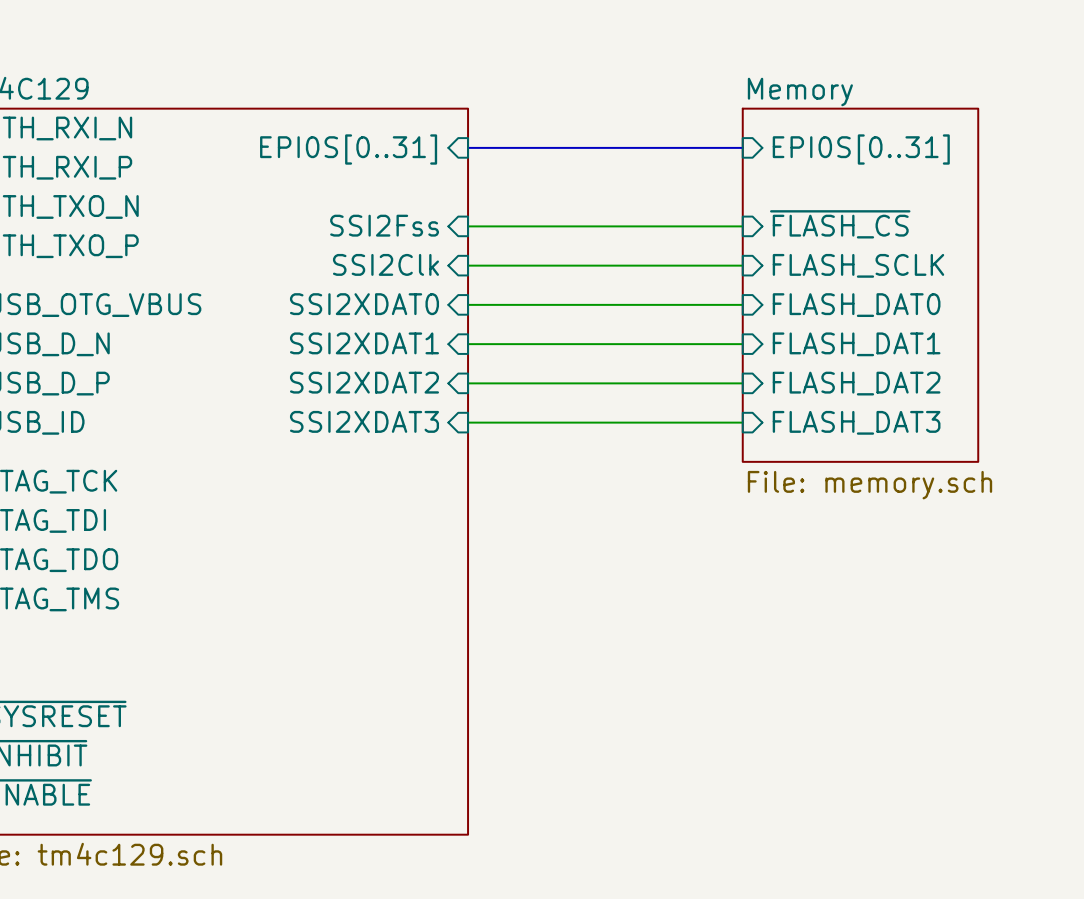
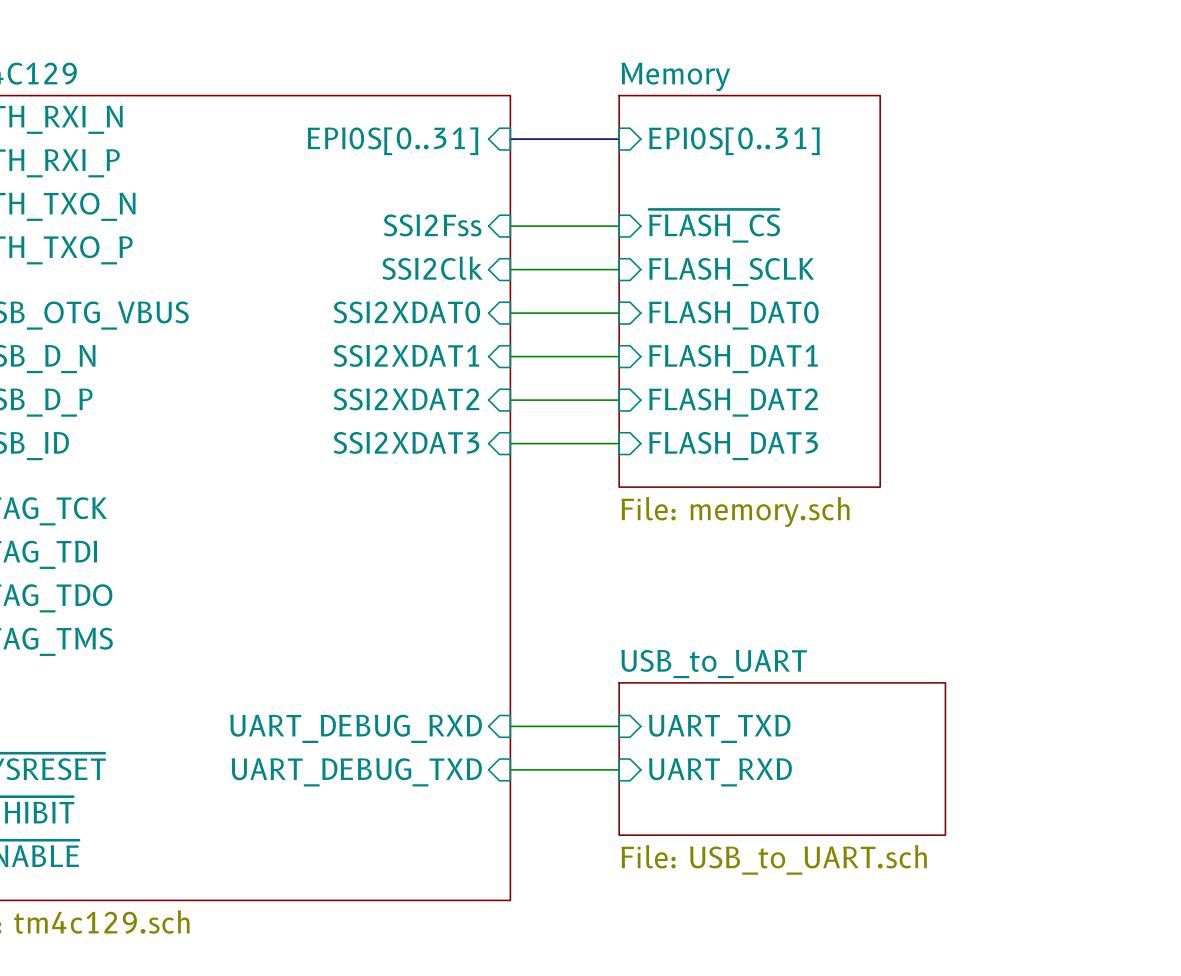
bus: (566, 147) (742, 147) -> none
sheet pin position: EPI0S[0..31] (861, 149) -> EPI0S[0..31] (734, 141)
sheet pin position: ~{FLASH_CS} (840, 224) -> ~{FLASH_CS} (714, 226)
wire: (566, 226) (742, 226) -> none
wire: (566, 265) (742, 265) -> none
sheet pin position: FLASH_SCLK (858, 265) -> FLASH_SCLK (731, 272)
sheet Memory position: (860, 285) -> (749, 291)
wire: (566, 304) (742, 304) -> none
sheet pin position: FLASH_DAT0 (856, 305) -> FLASH_DAT0 (733, 315)
wire: (566, 344) (742, 344) -> none
sheet pin position: FLASH_DAT1 (856, 344) -> FLASH_DAT1 (733, 359)
wire: (566, 383) (742, 383) -> none
sheet pin position: FLASH_DAT2 (856, 383) -> FLASH_DAT2 (733, 402)
wire: (566, 422) (742, 422) -> none
sheet pin position: FLASH_DAT3 (856, 422) -> FLASH_DAT3 (733, 446)
sheet pin: none -> UART_DEBUG_RXD (356, 728)
wire: none -> (510, 726) (619, 726)
sheet pin: none -> UART_TXD (719, 728)
sheet USB_to_UART: none -> File: USB_to_UART.sch (782, 759)
wire: none -> (510, 769) (619, 769)
sheet pin: none -> UART_DEBUG_TXD (356, 772)
sheet pin: none -> UART_RXD (720, 772)

